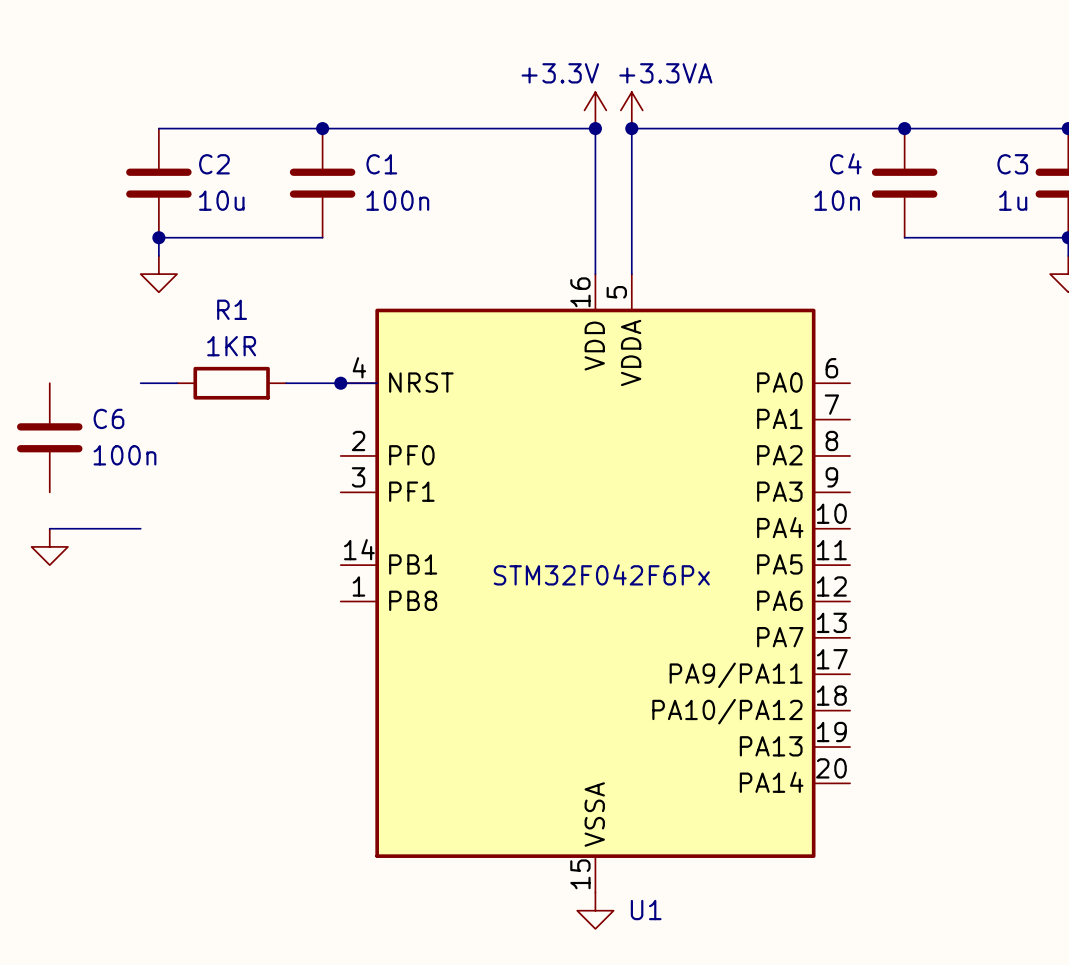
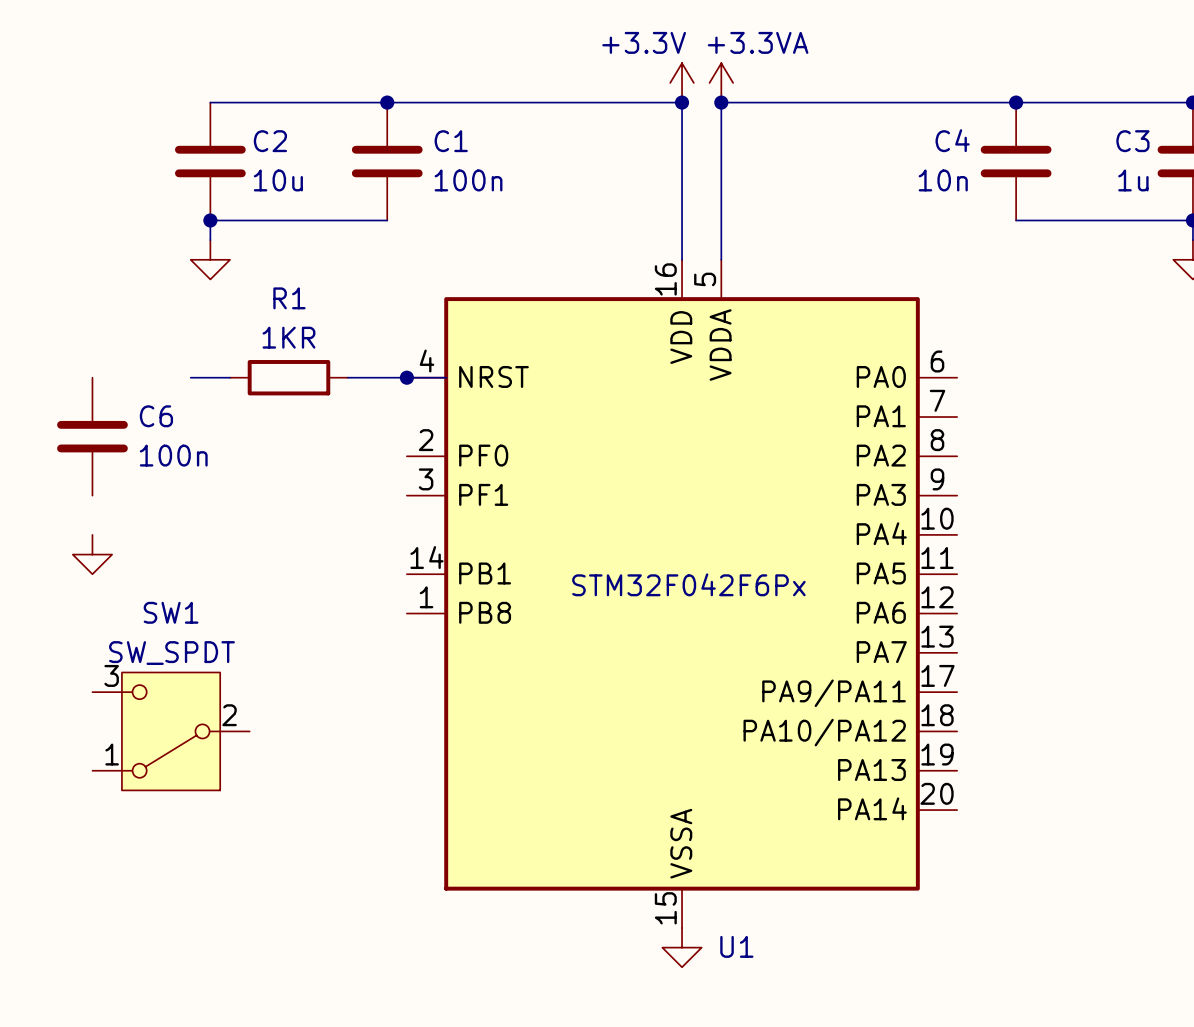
wire: (49, 528) (140, 528) -> none
SW1: none -> SW_SPDT (171, 731)

